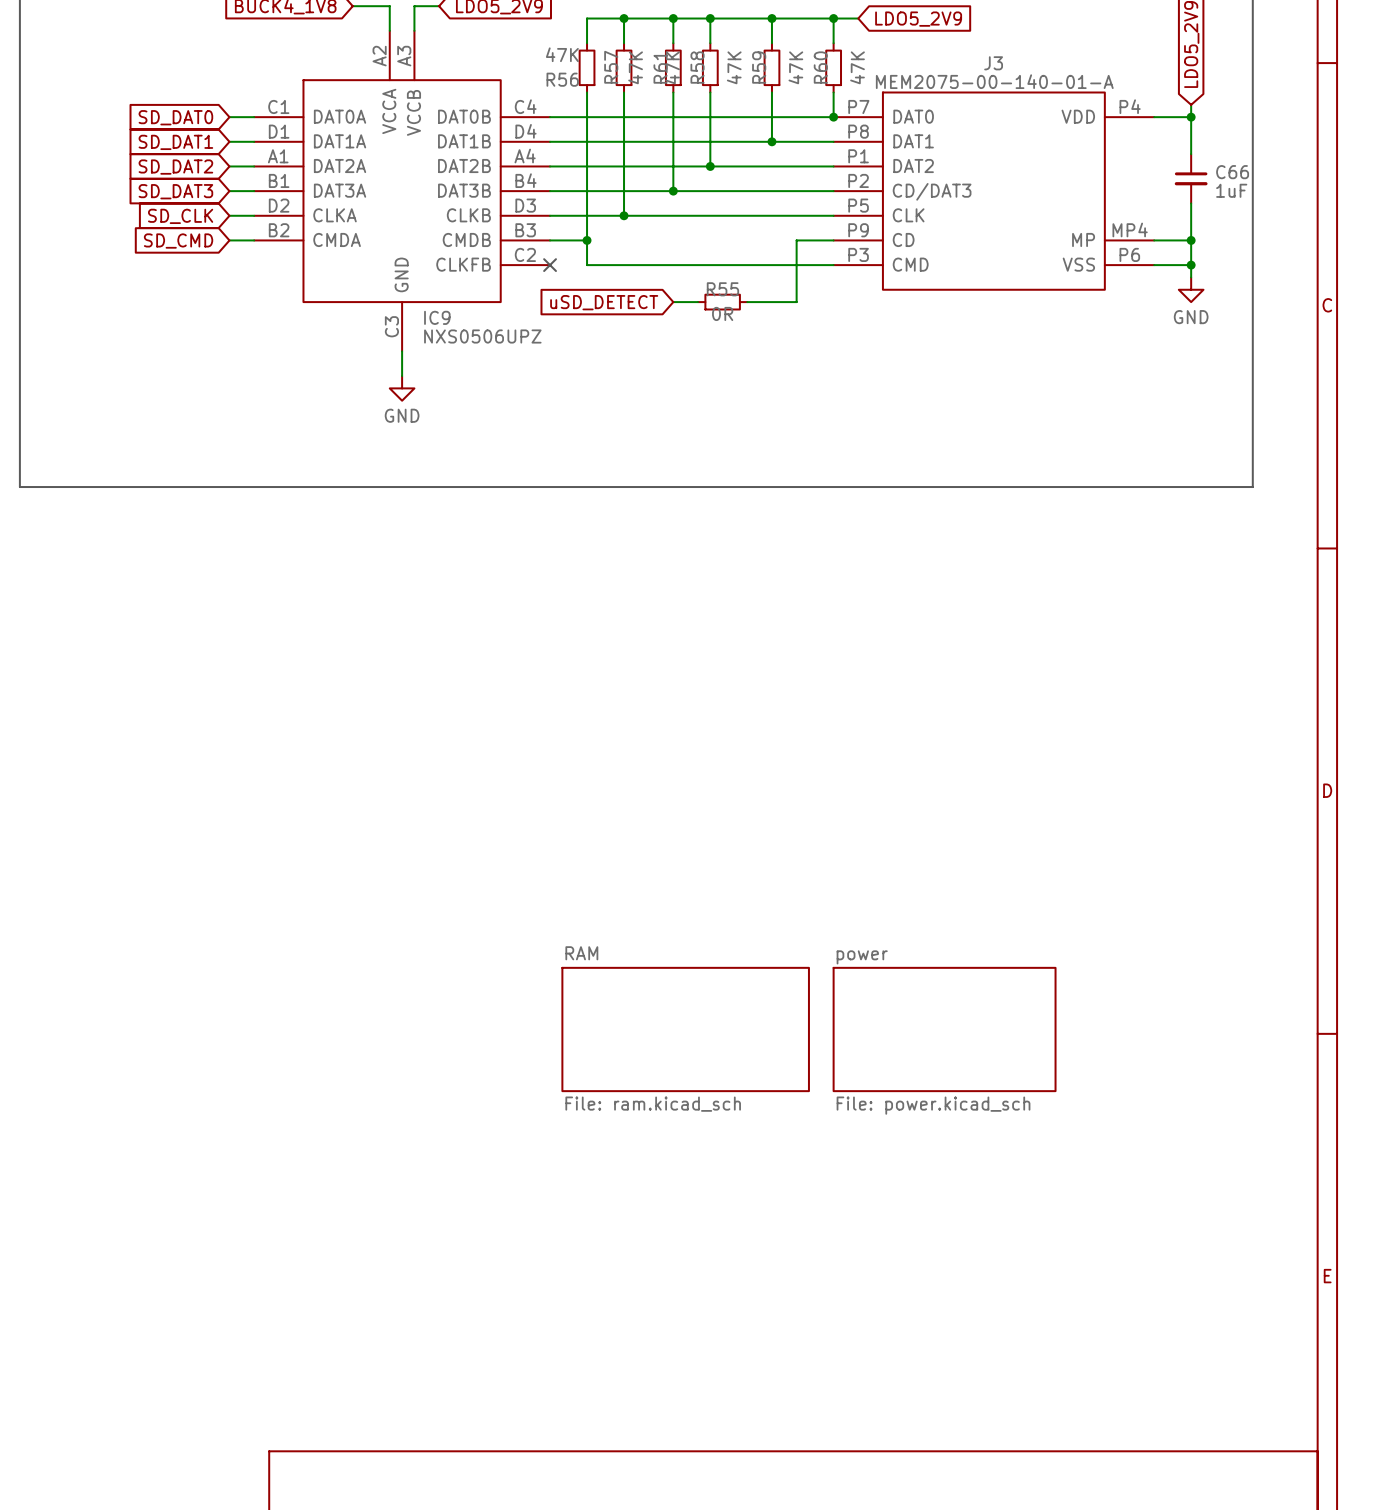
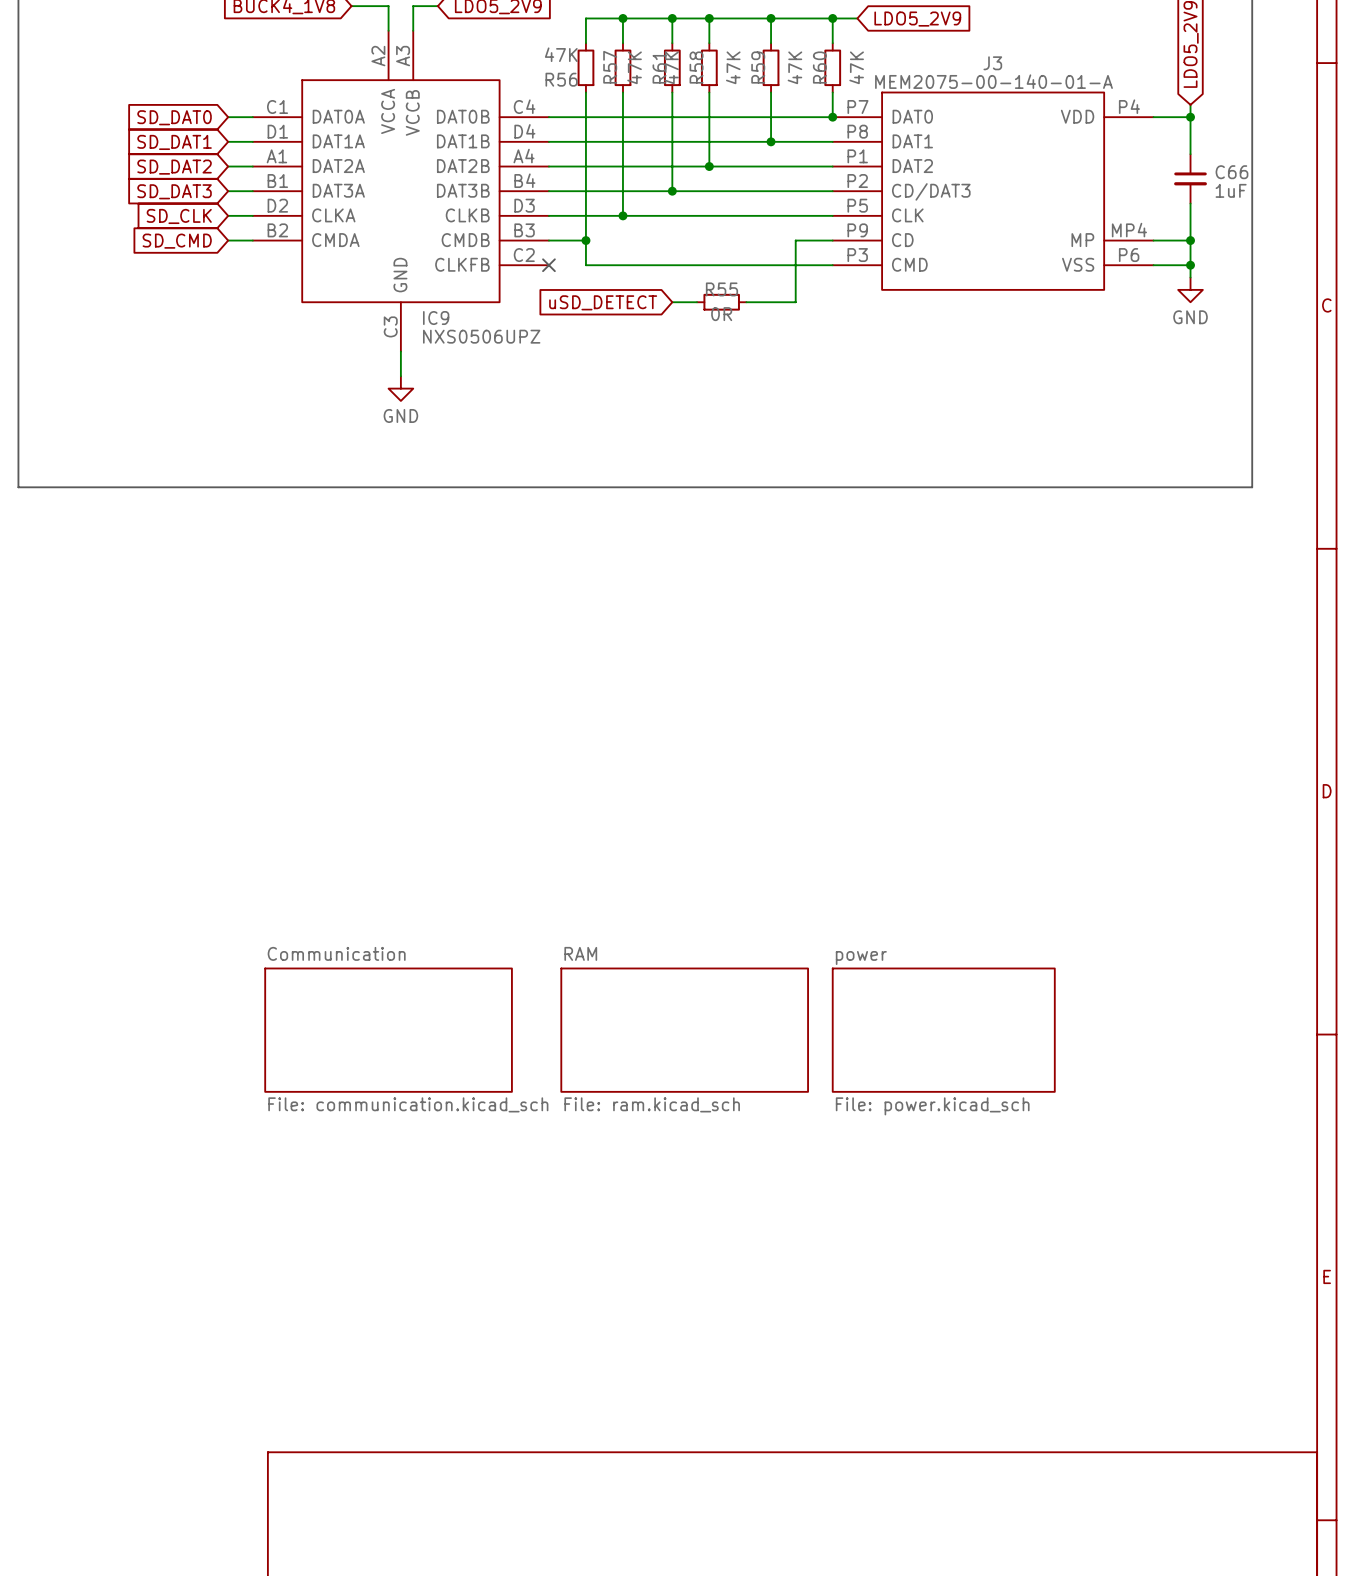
sheet Communication: none -> File: communication.kicad_sch (388, 1030)

